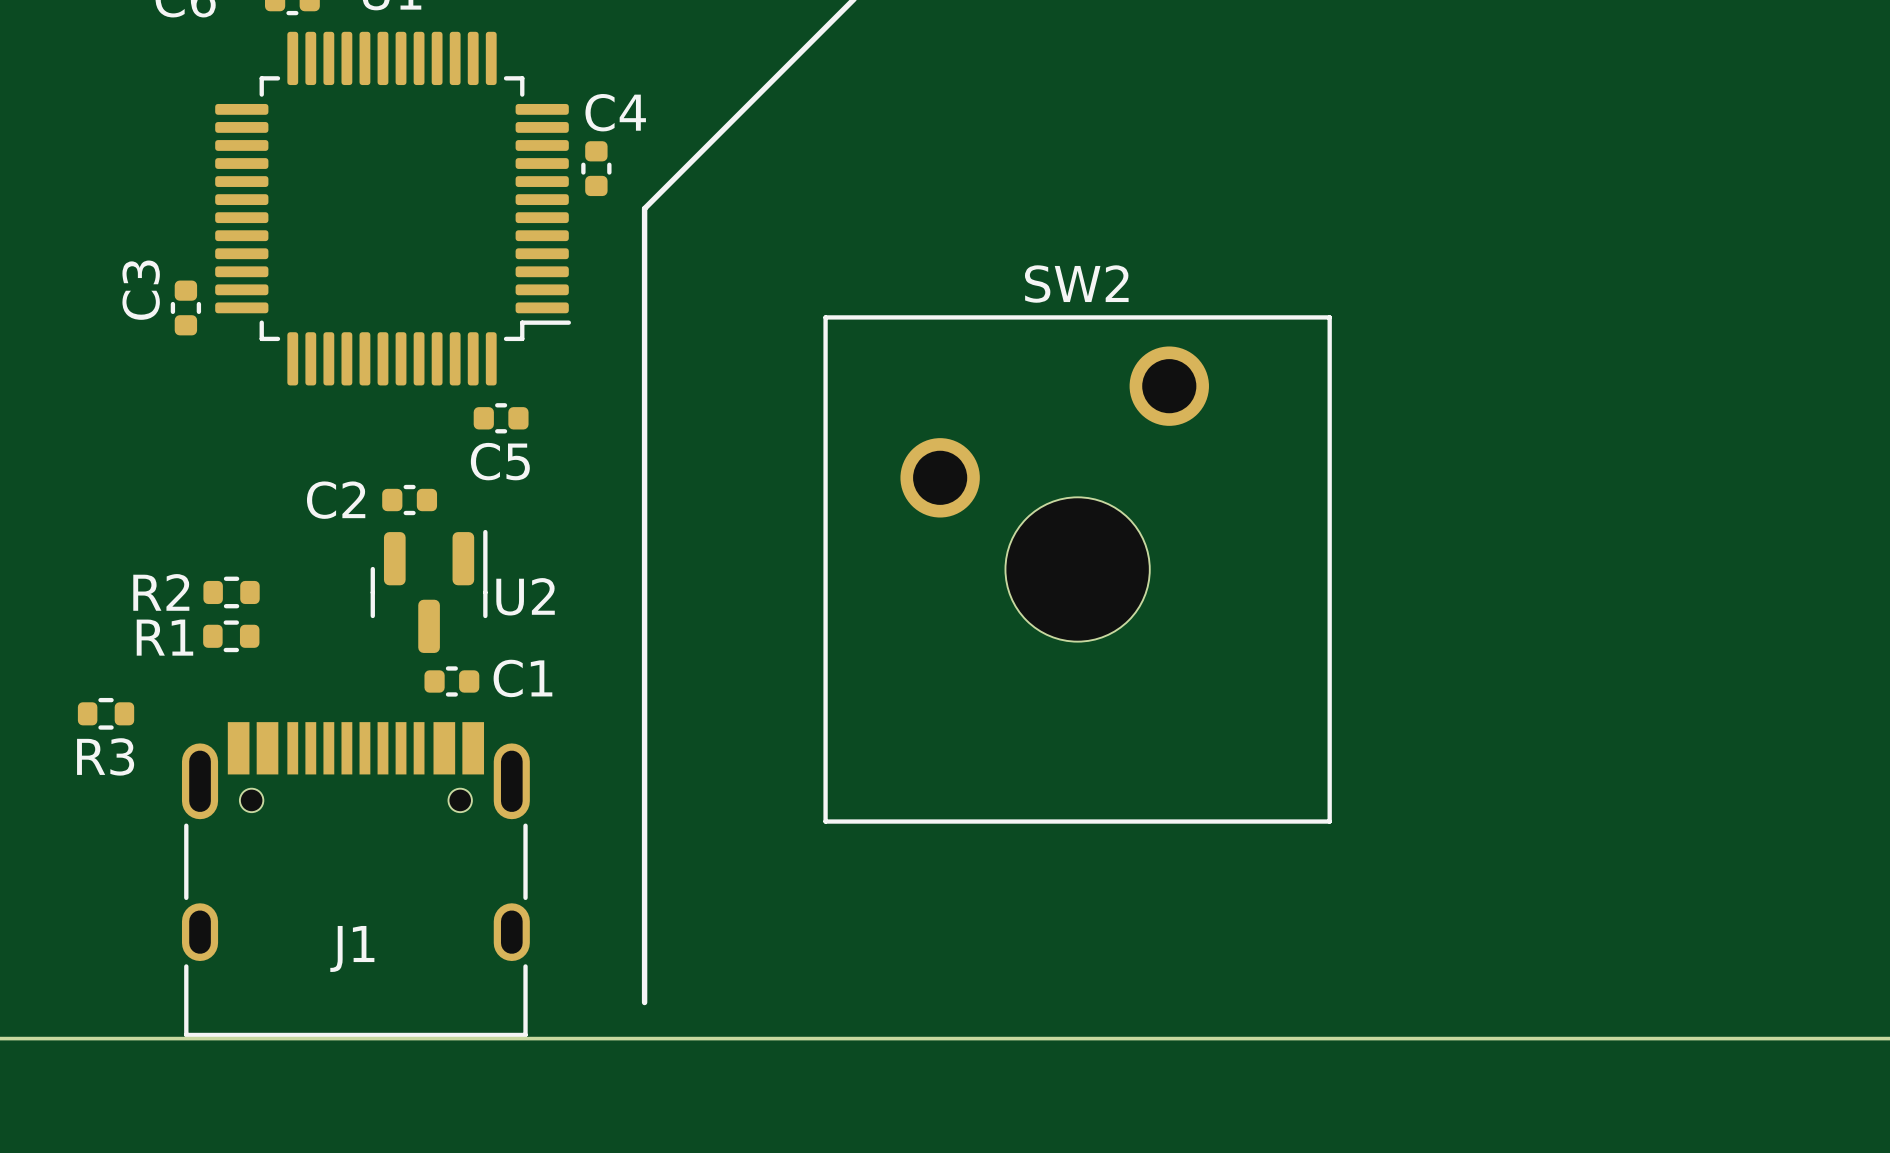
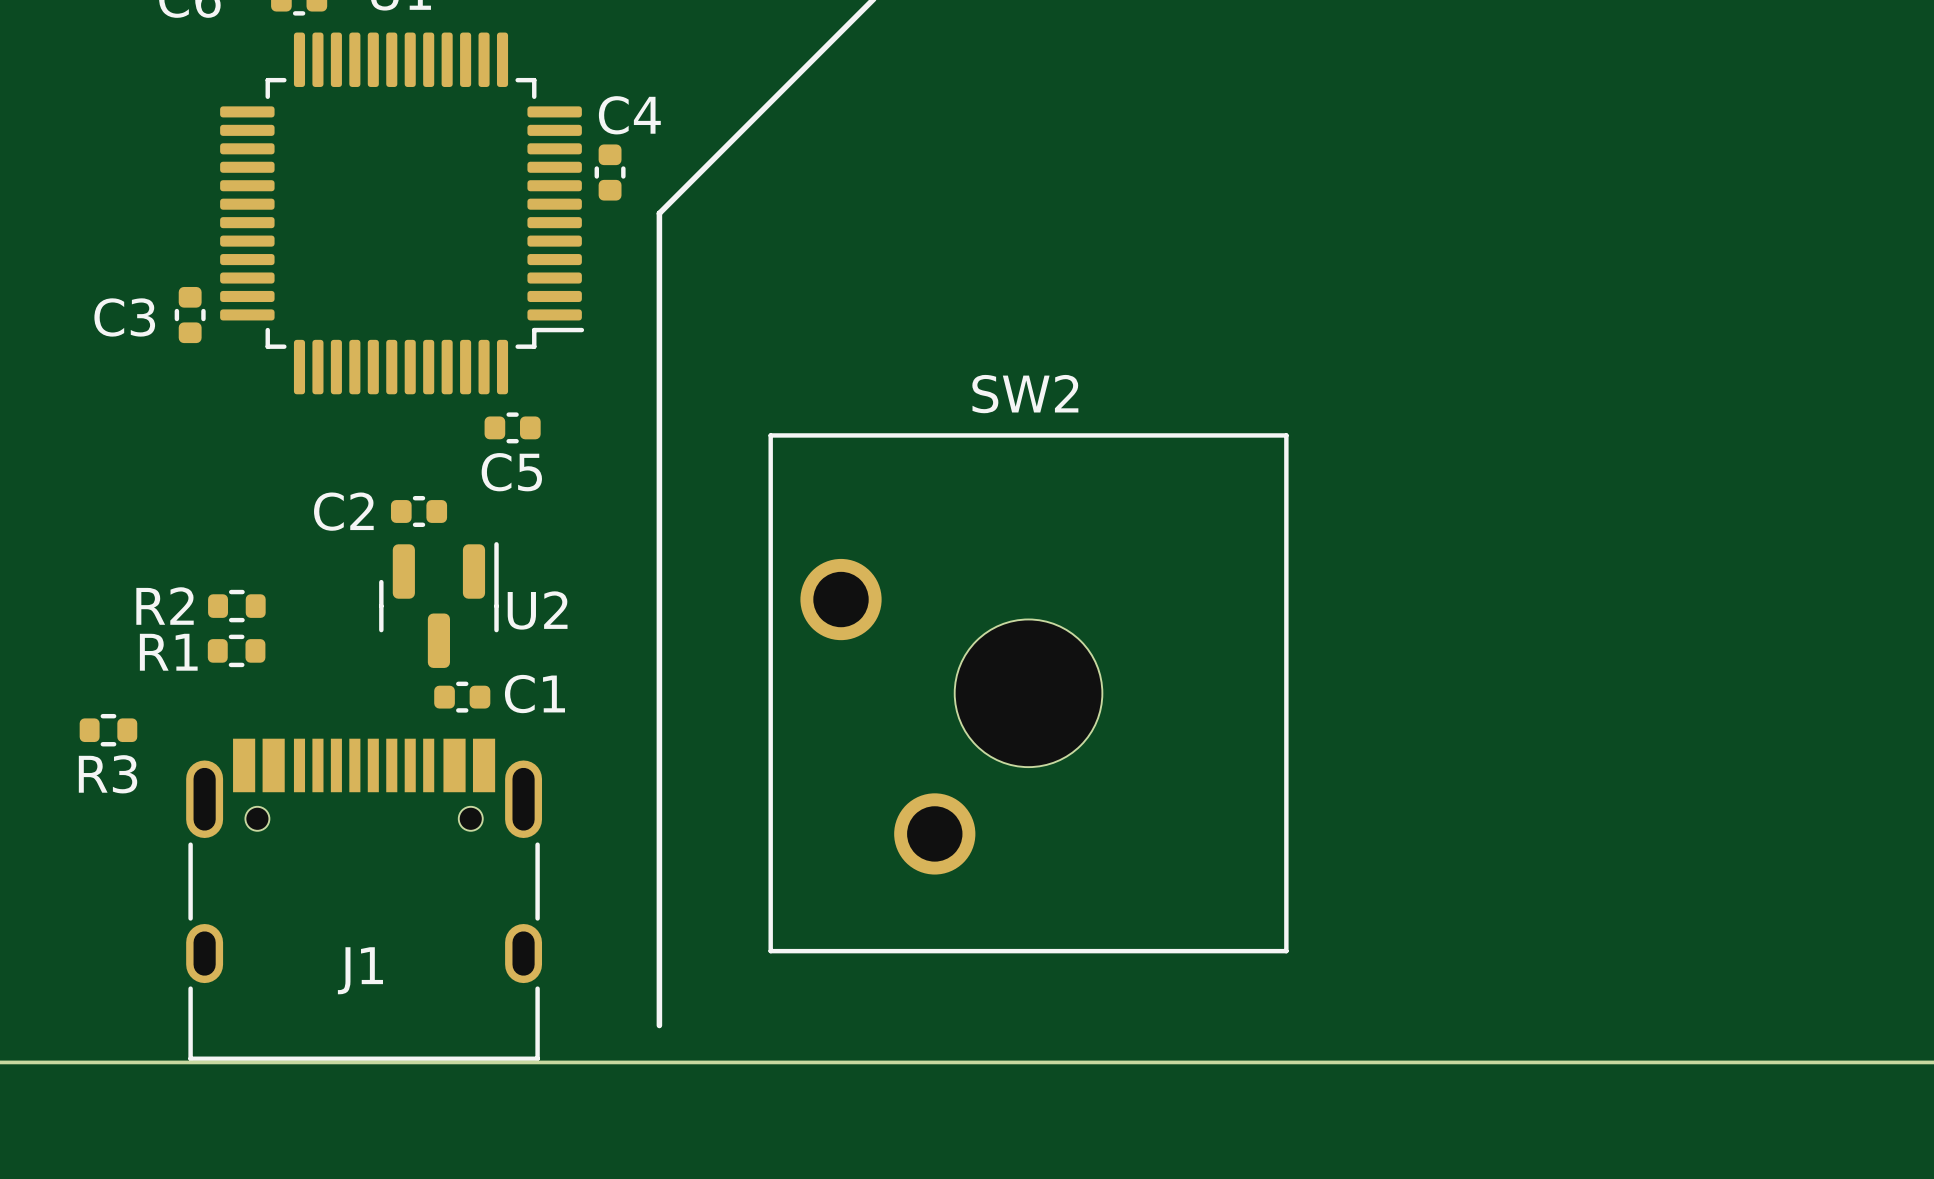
C3 name rotation: 0° (141, 290) -> 90° clockwise (124, 317)
SW2 rotation: 0° (1077, 569) -> 90° counterclockwise (1028, 693)

